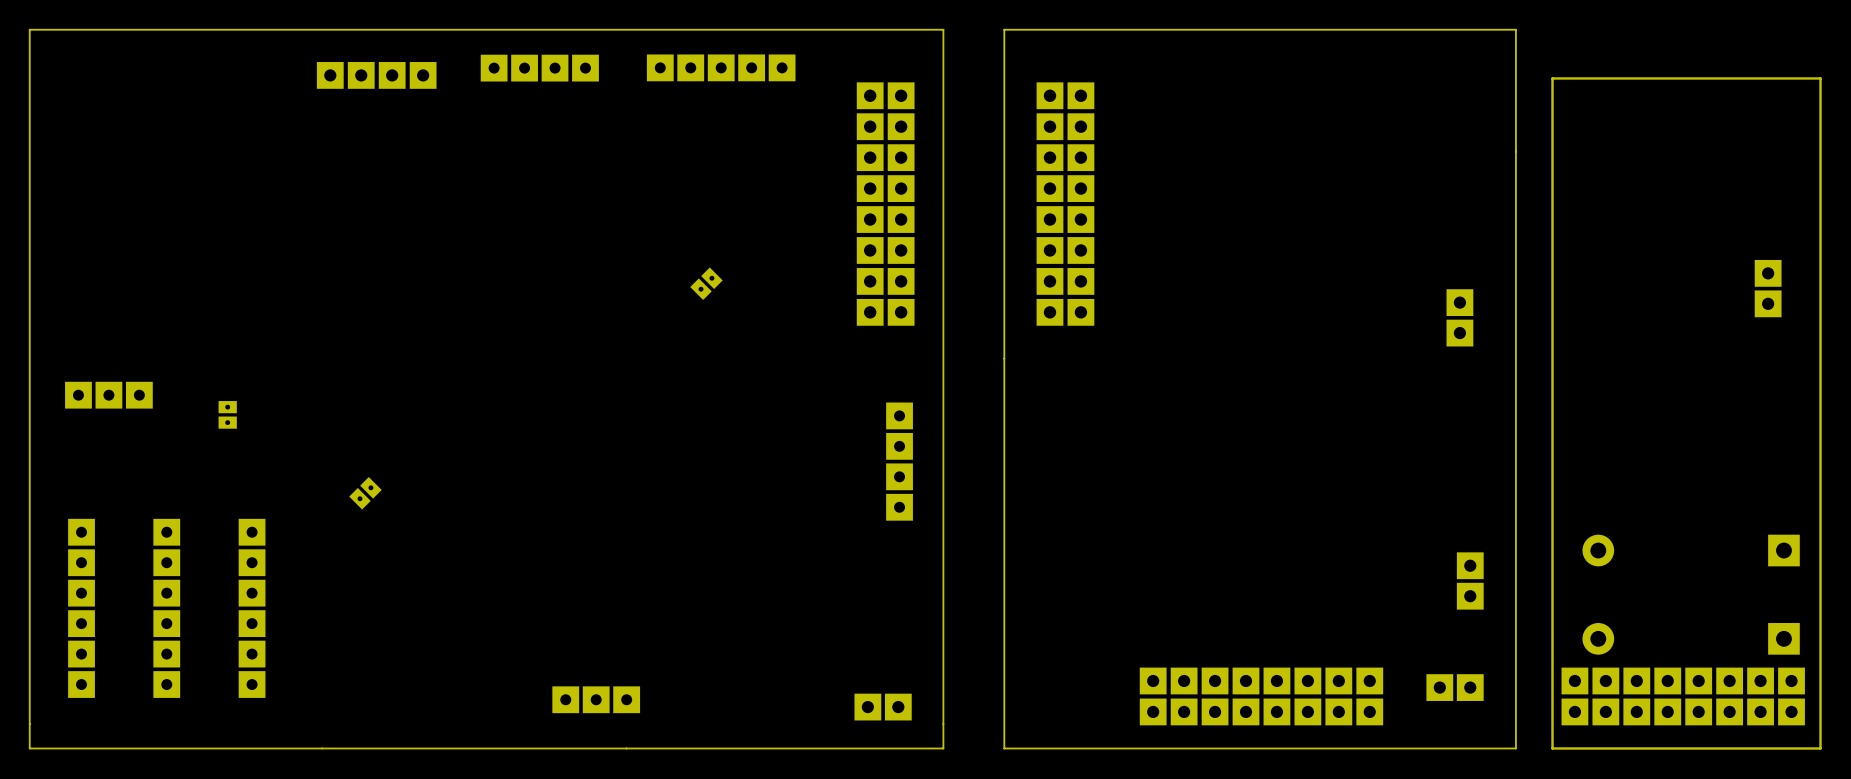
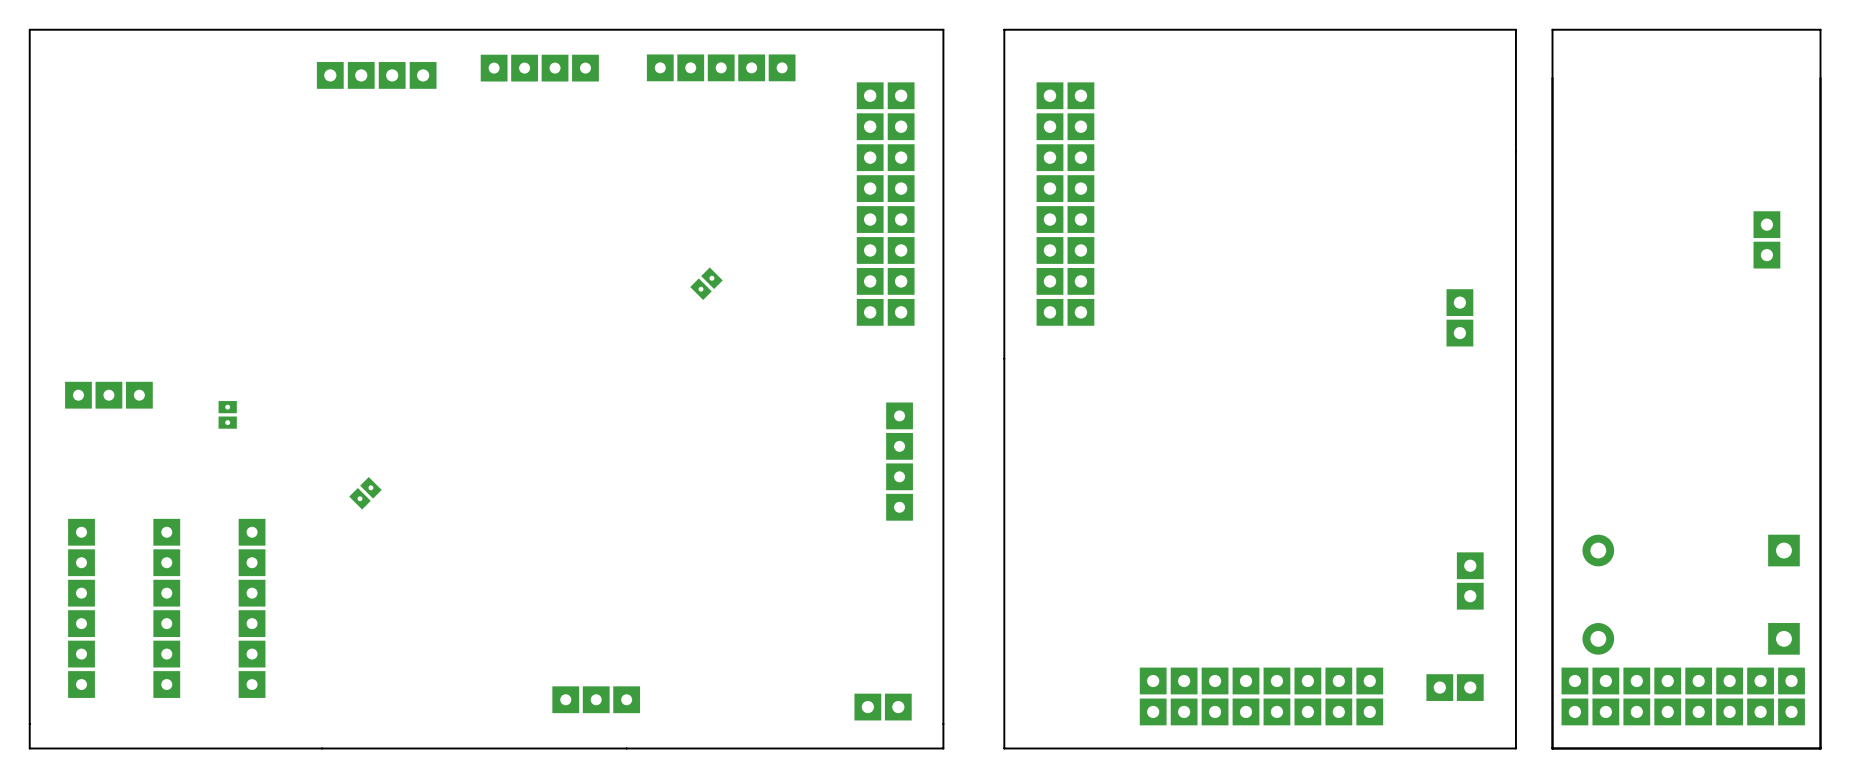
board edge: (1820, 78) (1552, 78) -> (1820, 78) (1820, 29) (1552, 29) (1552, 78)
part position: (1768, 288) -> (1766, 239)

